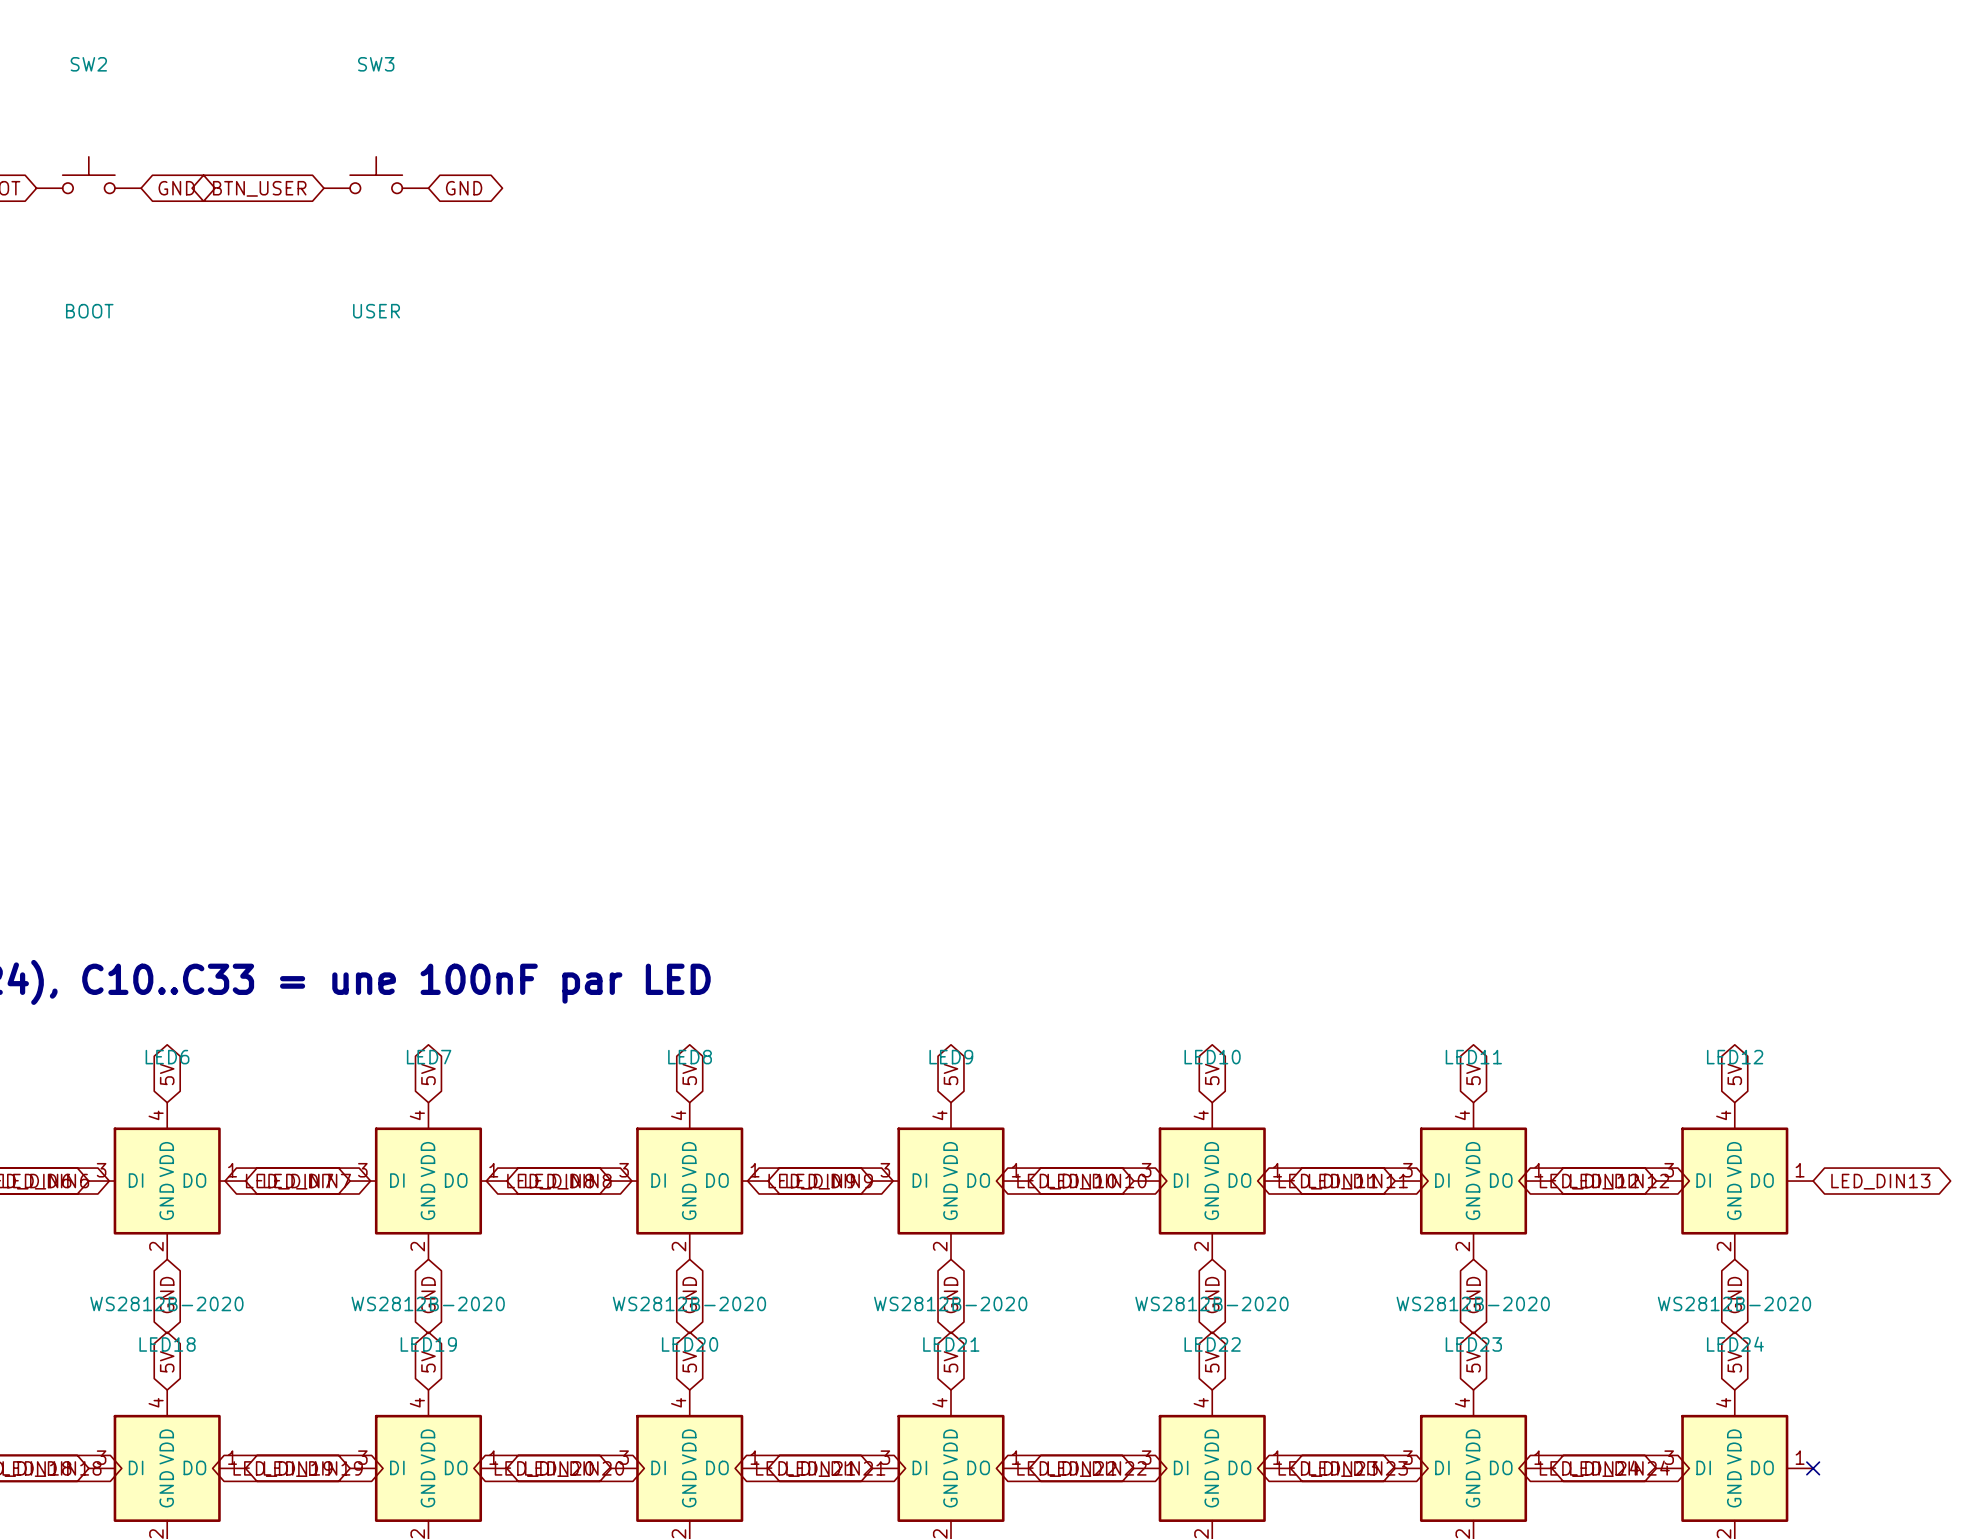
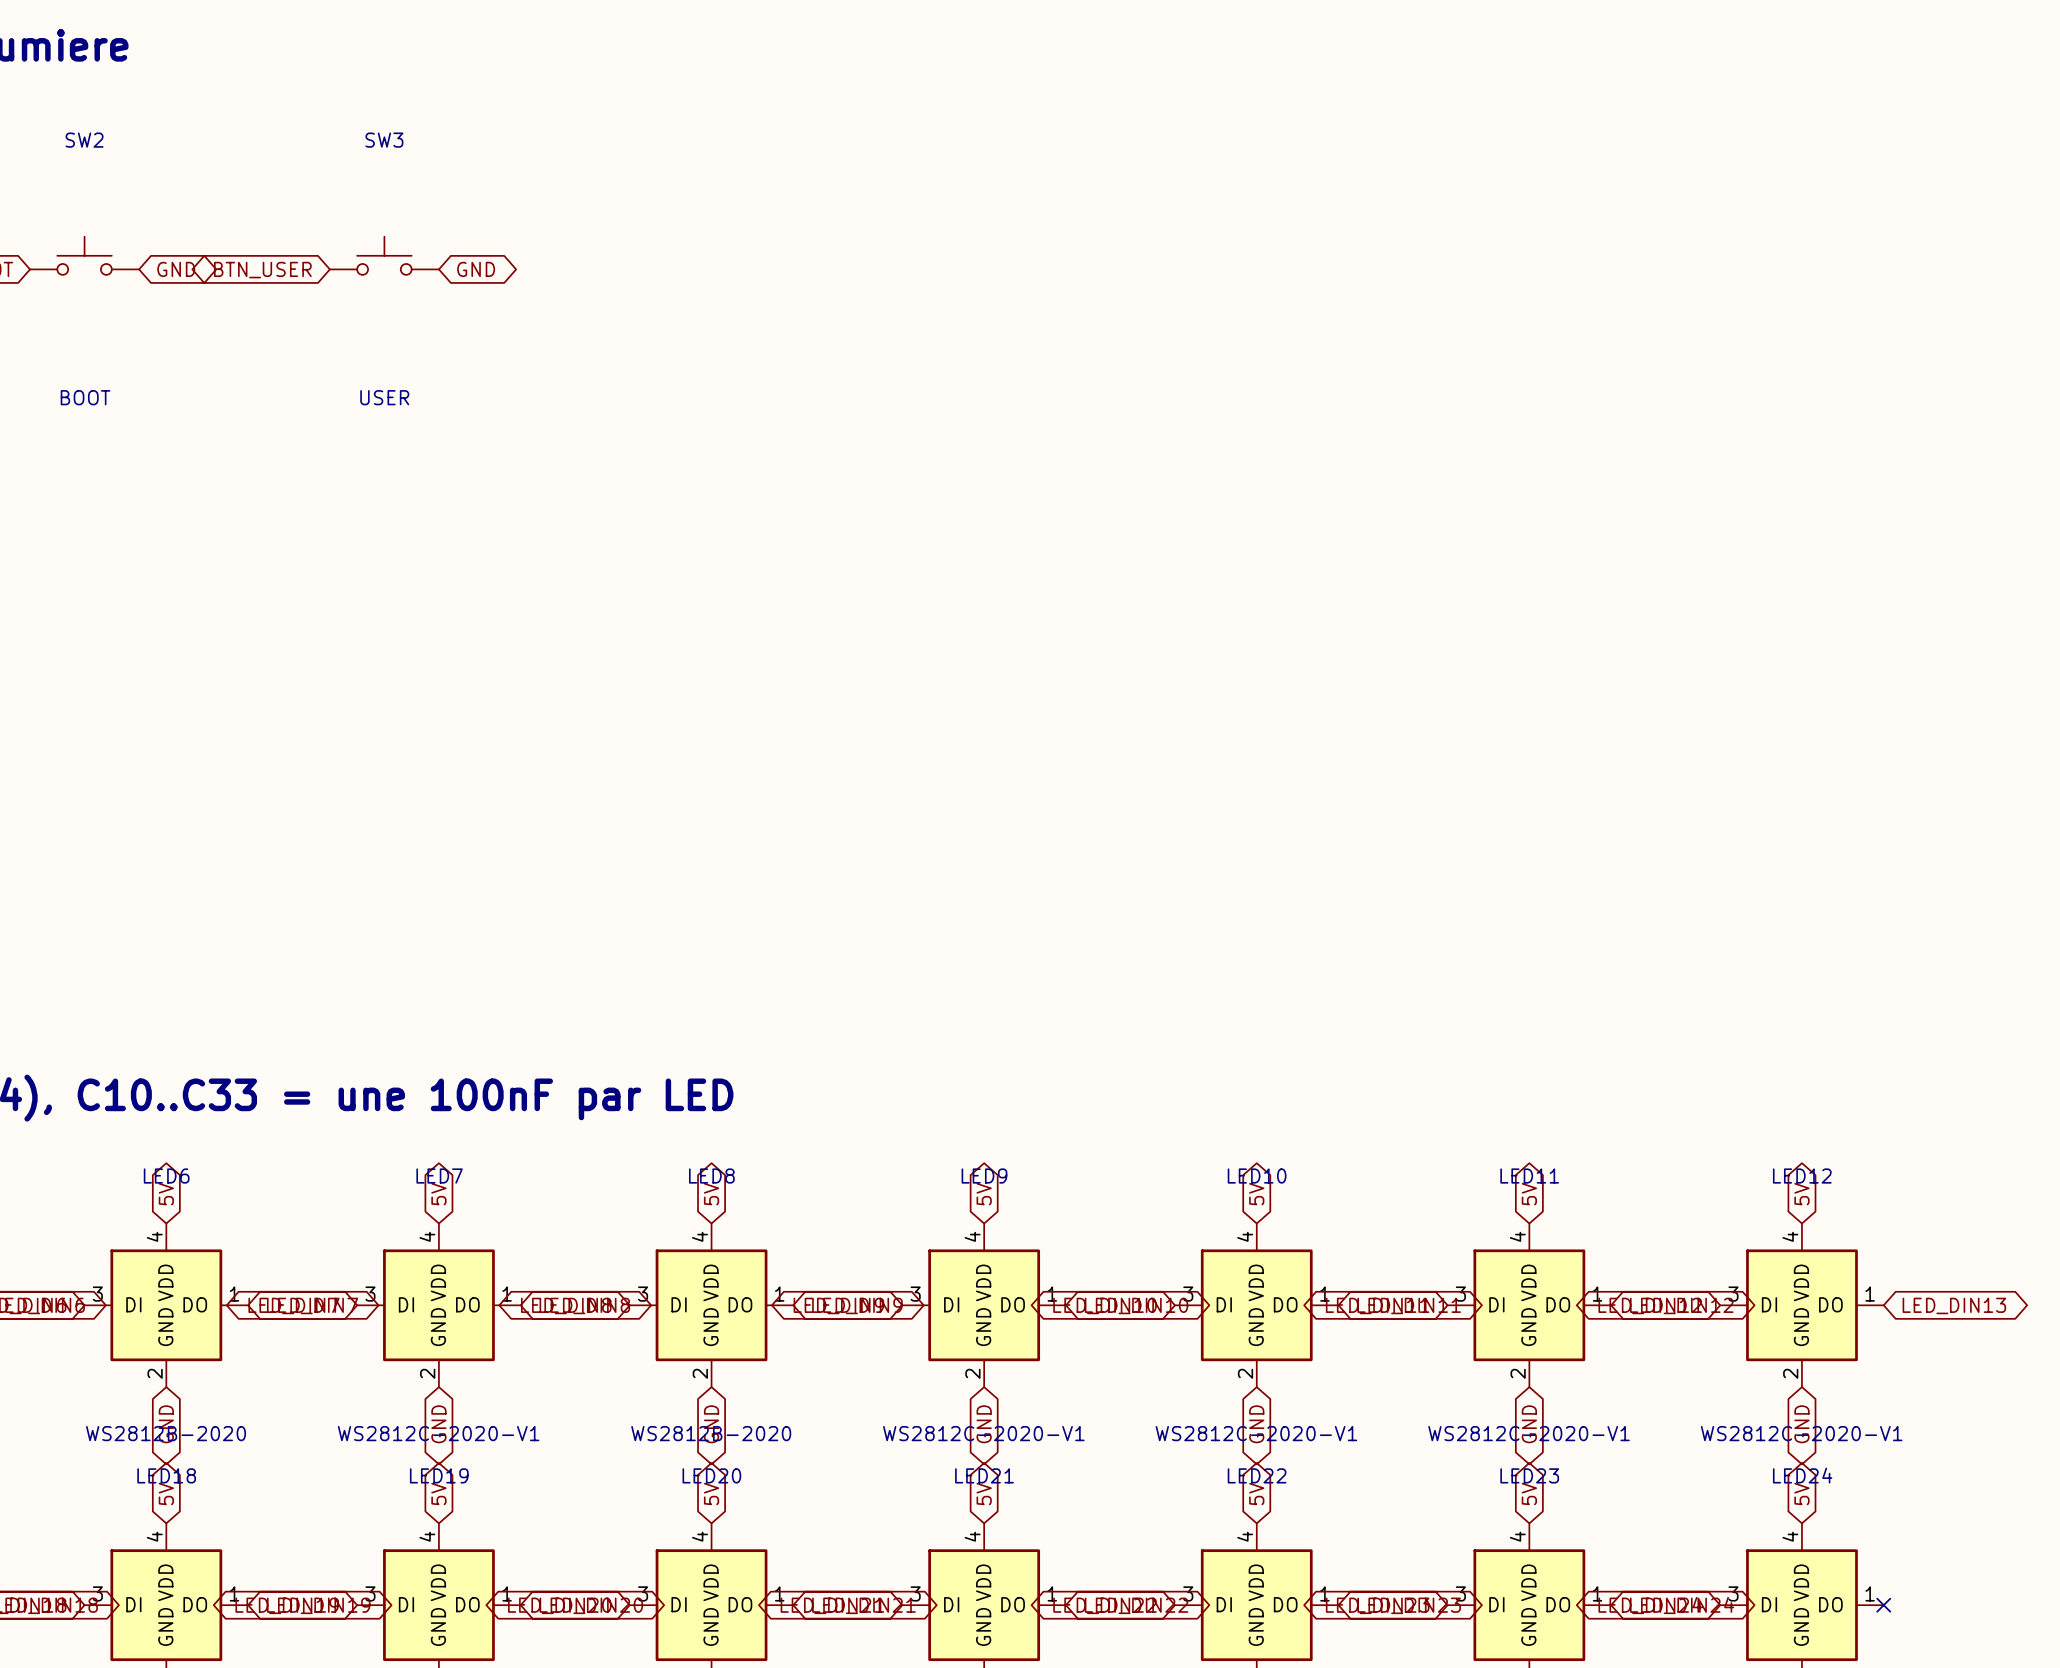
LED7 value: WS2812B-2020 (428, 1303) -> WS2812C-2020-V1 (438, 1433)
LED9 value: WS2812B-2020 (950, 1303) -> WS2812C-2020-V1 (983, 1433)
LED10 value: WS2812B-2020 (1211, 1303) -> WS2812C-2020-V1 (1256, 1433)
LED11 value: WS2812B-2020 (1473, 1303) -> WS2812C-2020-V1 (1529, 1433)
LED12 value: WS2812B-2020 (1734, 1303) -> WS2812C-2020-V1 (1801, 1433)

